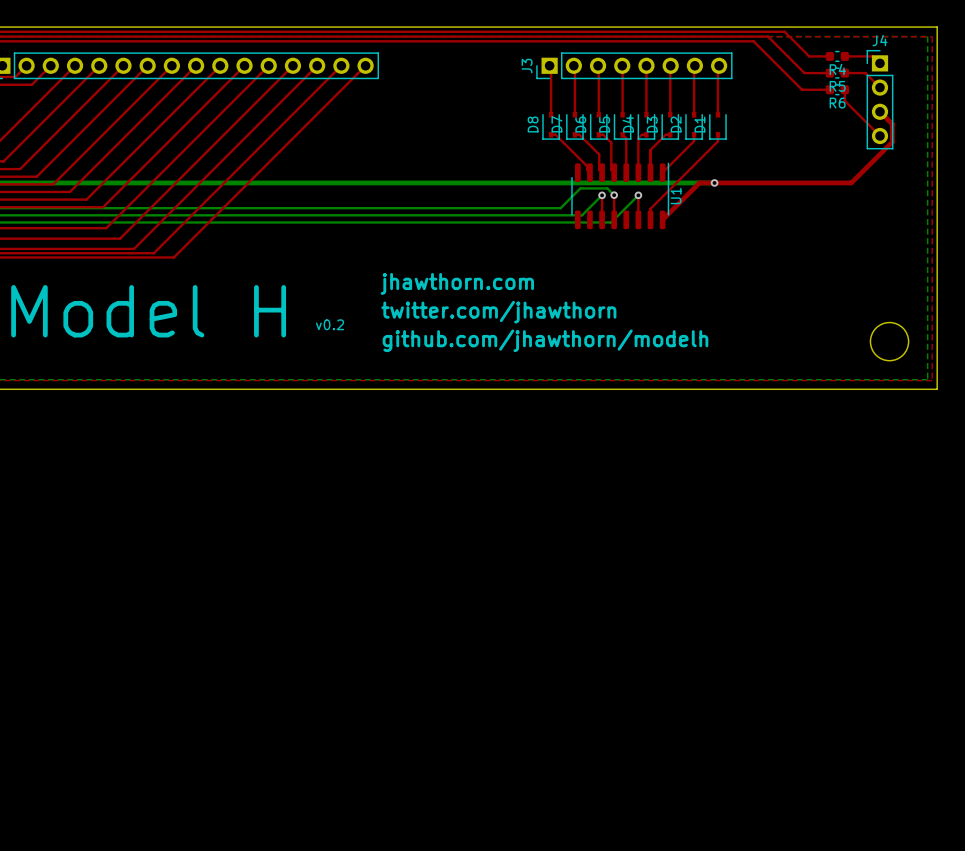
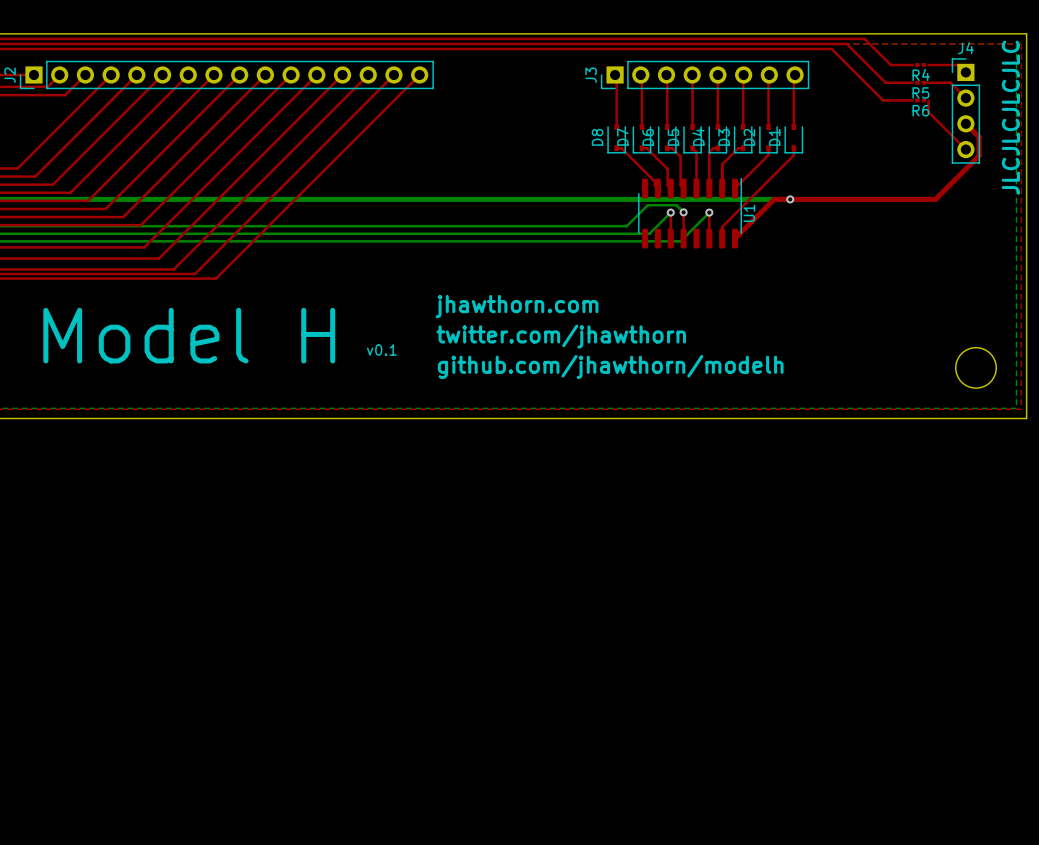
R4 footprint: [825, 50, 850, 62] -> [915, 62, 927, 68]
R5 footprint: [825, 67, 850, 79] -> [915, 80, 927, 85]
R6 footprint: [825, 84, 850, 96] -> [915, 98, 927, 103]
text: none -> JLCJLCJLCJLC (1010, 117)
text: v0.2 (330, 324) -> v0.1 (381, 350)

